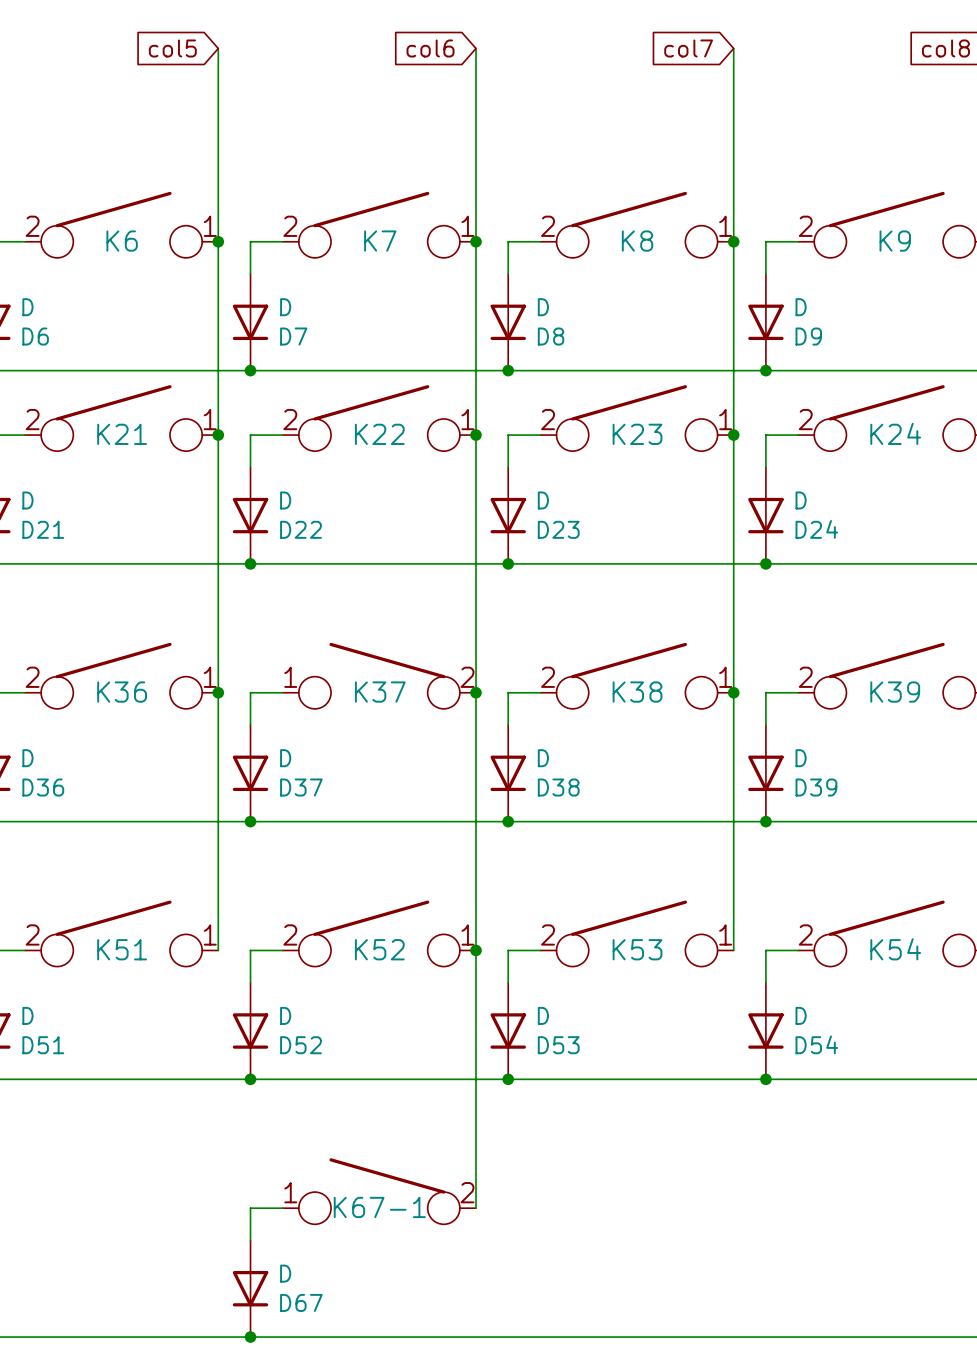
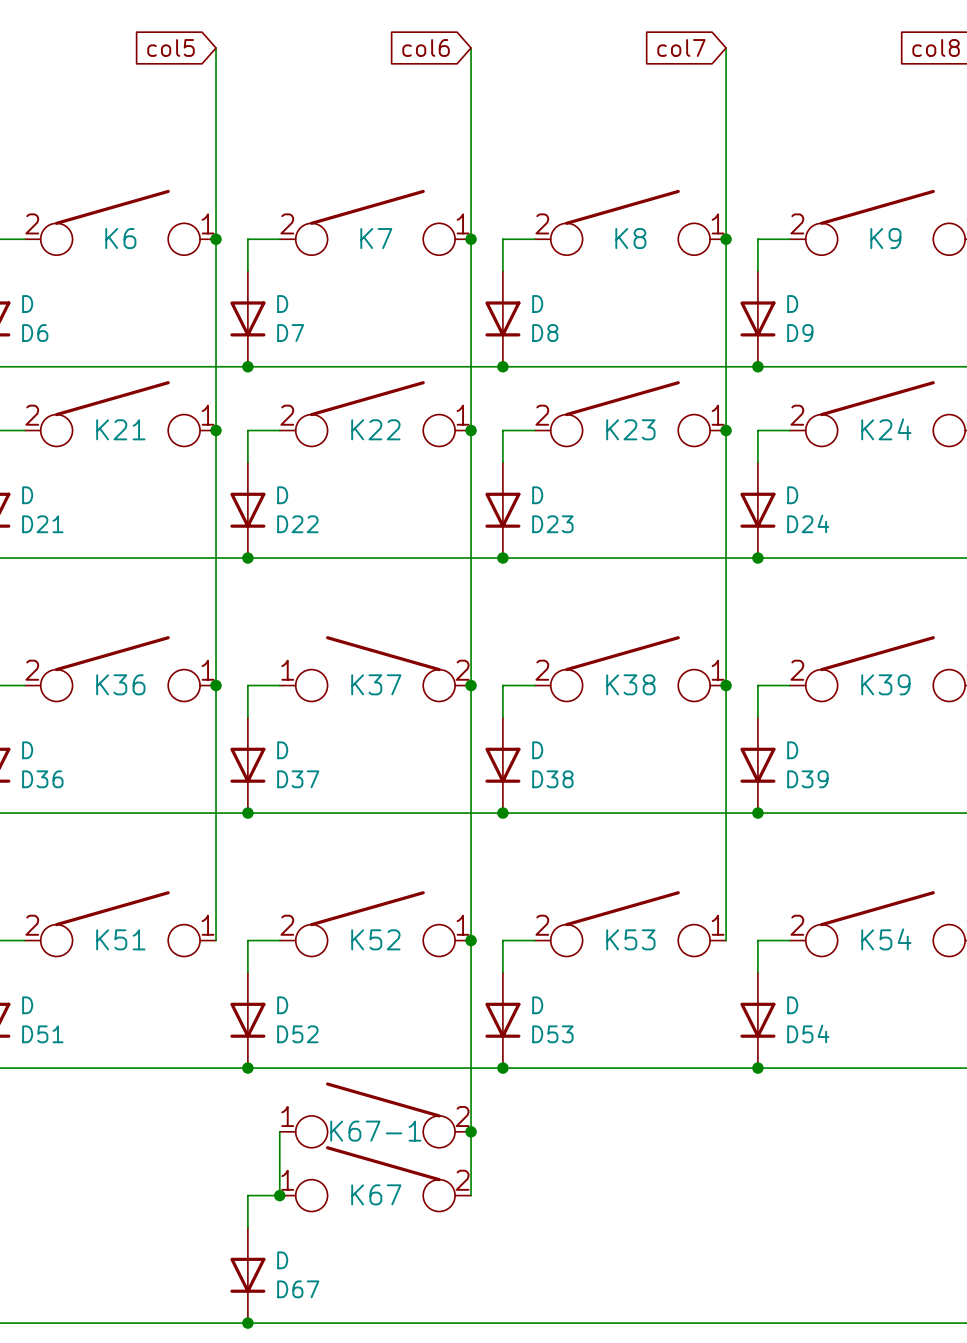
K67-1: none -> (375, 1115)
wire: none -> (279, 1131) (279, 1195)
junction: none -> (471, 1131)
K67-1 name: K67-1 (379, 1207) -> K67 (376, 1194)
junction: none -> (279, 1195)

